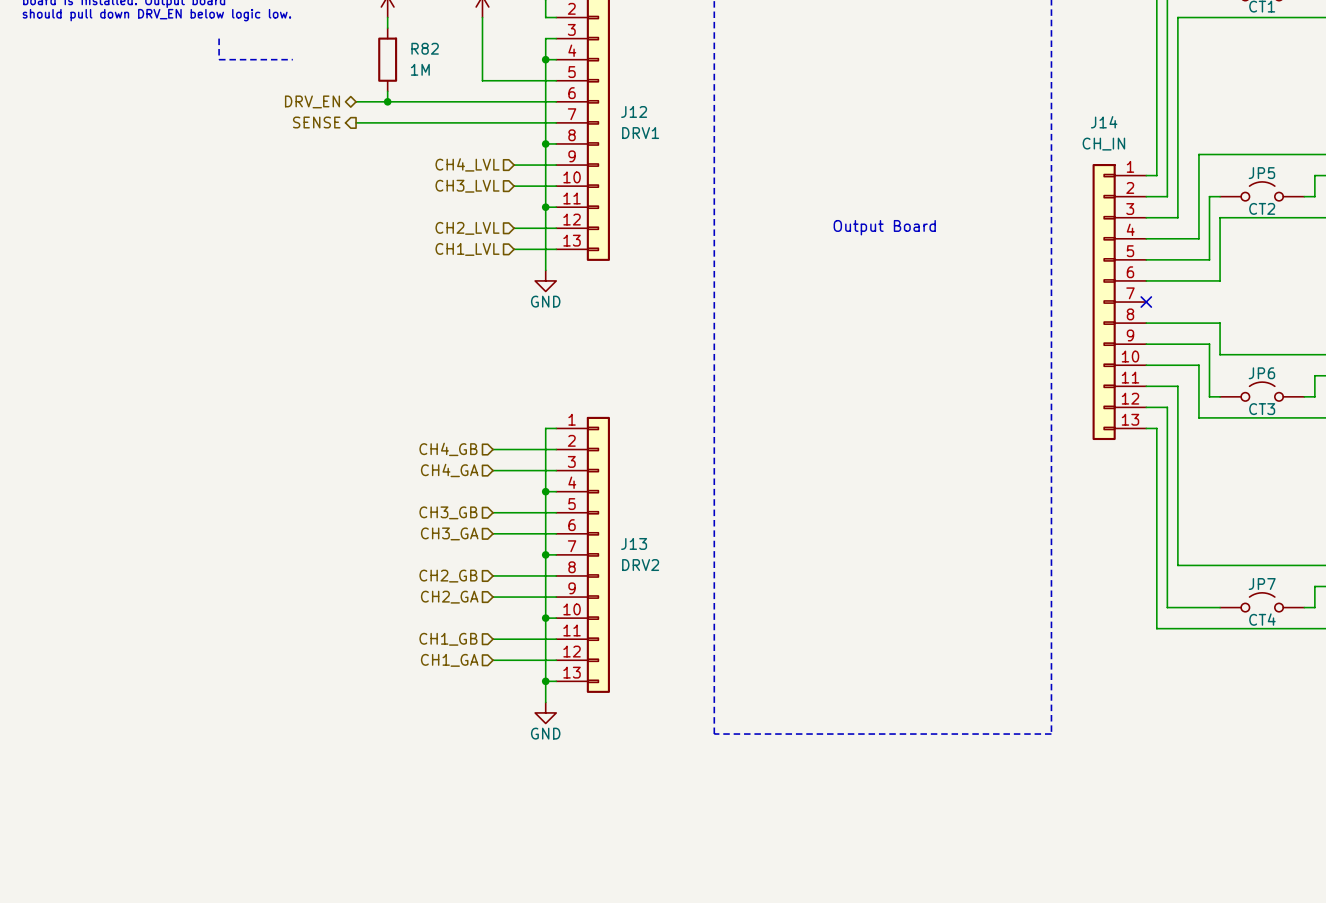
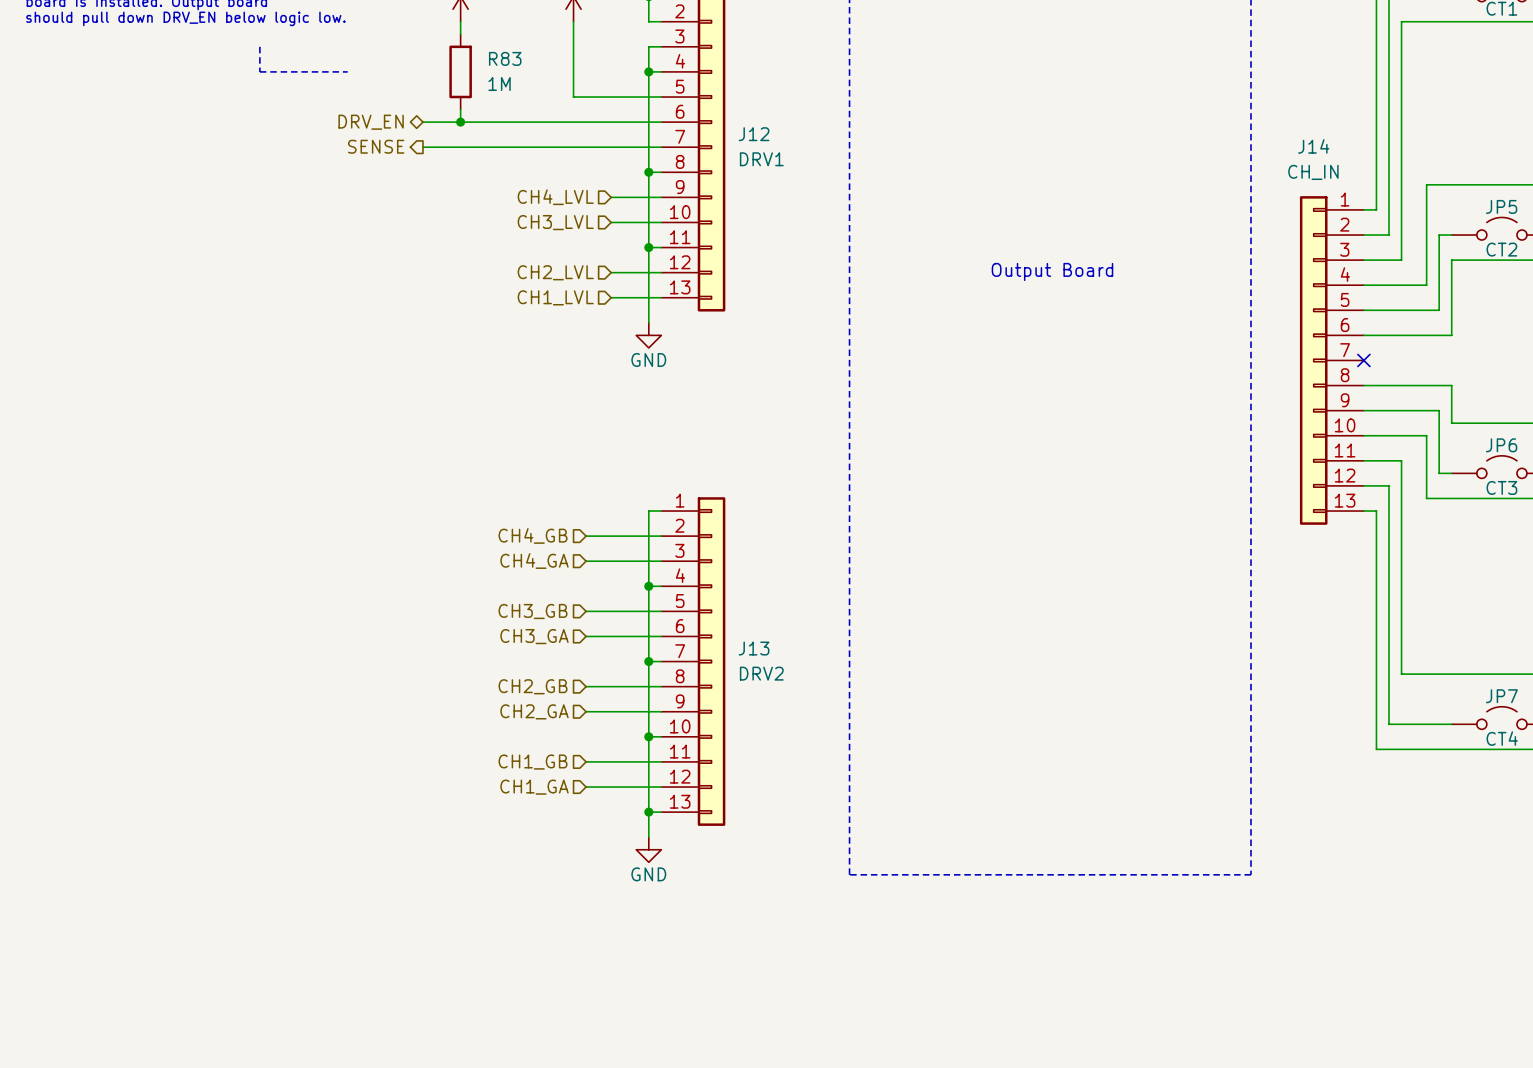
R82 name: R82 (425, 48) -> R83 (505, 58)

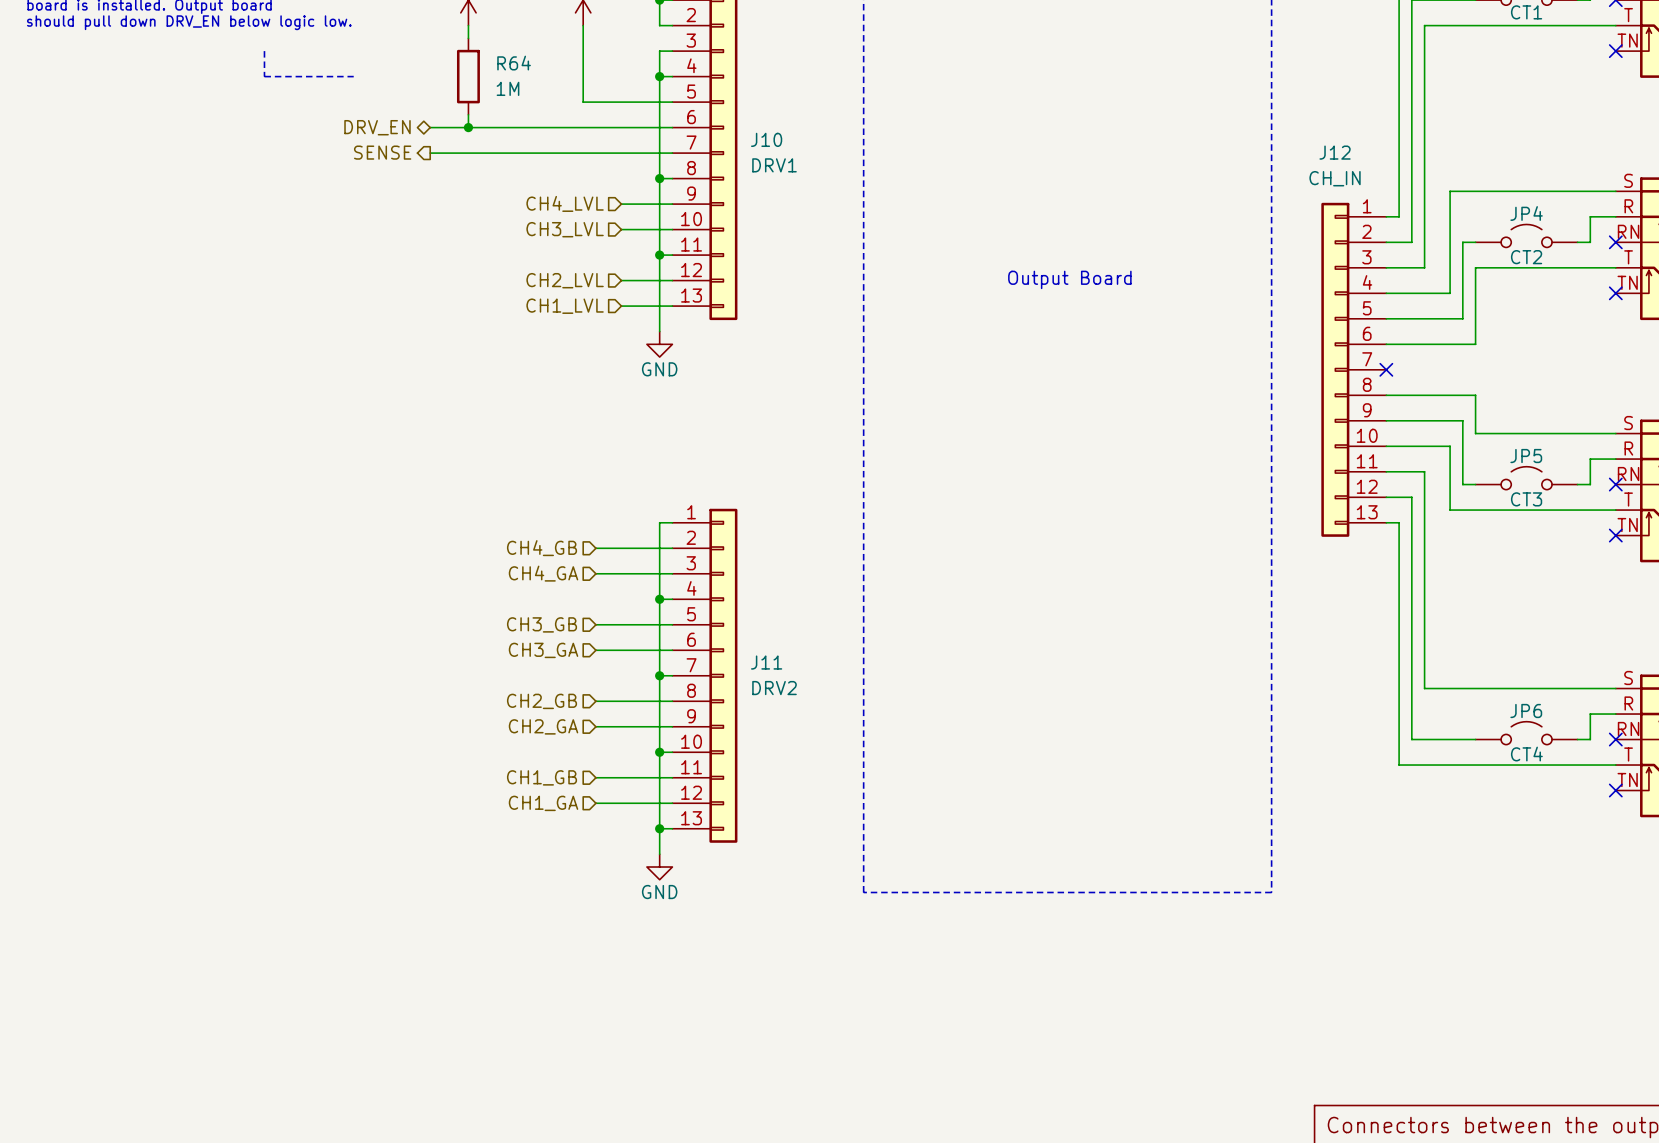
R83 name: R83 (505, 58) -> R64 (514, 63)
J12 name: J12 (754, 134) -> J10 (766, 139)
J14 name: J14 (1313, 146) -> J12 (1335, 152)
JP5 name: JP5 (1501, 206) -> JP4 (1526, 213)
JP6 name: JP6 (1501, 445) -> JP5 (1526, 456)
J13 name: J13 (754, 648) -> J11 (766, 662)
JP7 name: JP7 (1501, 696) -> JP6 (1526, 710)

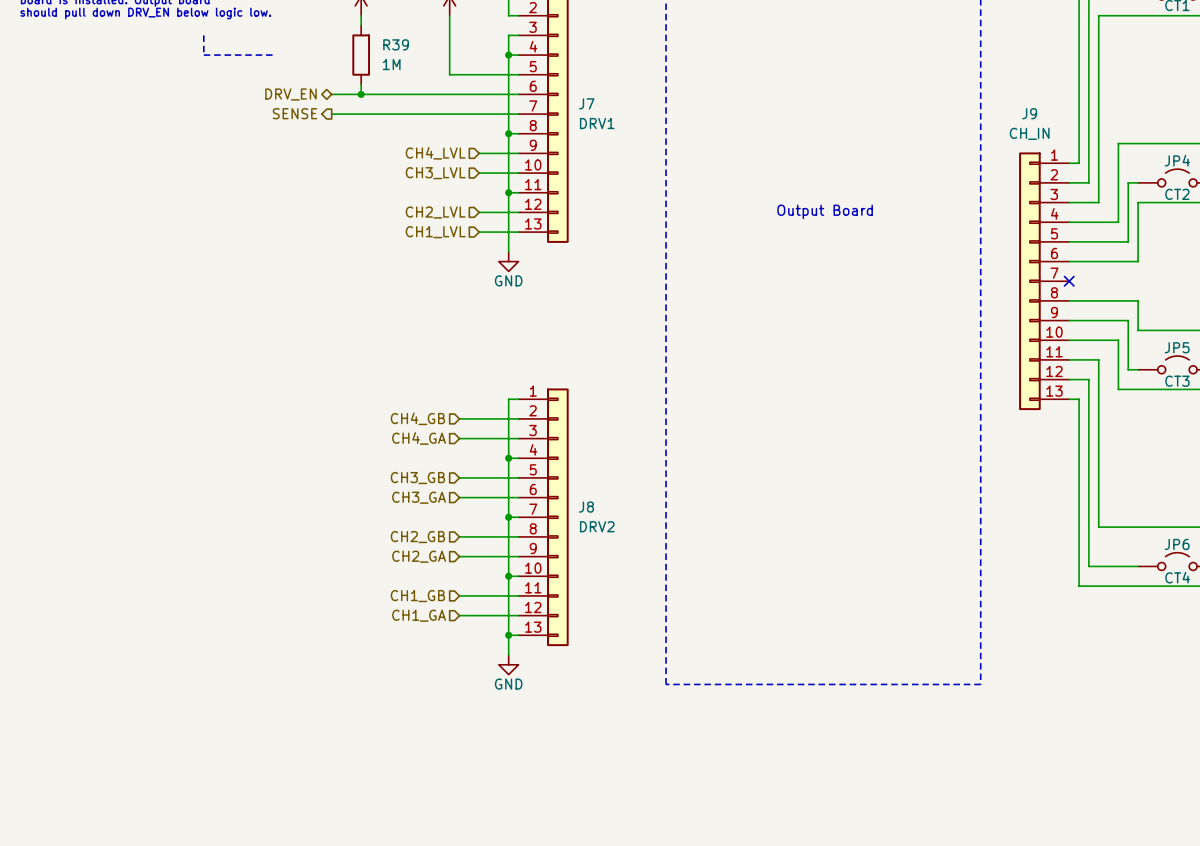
R64 name: R64 (514, 63) -> R39 (396, 44)
J10 name: J10 (766, 139) -> J7 (586, 103)
J12 name: J12 (1335, 152) -> J9 (1029, 113)
J11 name: J11 (766, 662) -> J8 (586, 507)

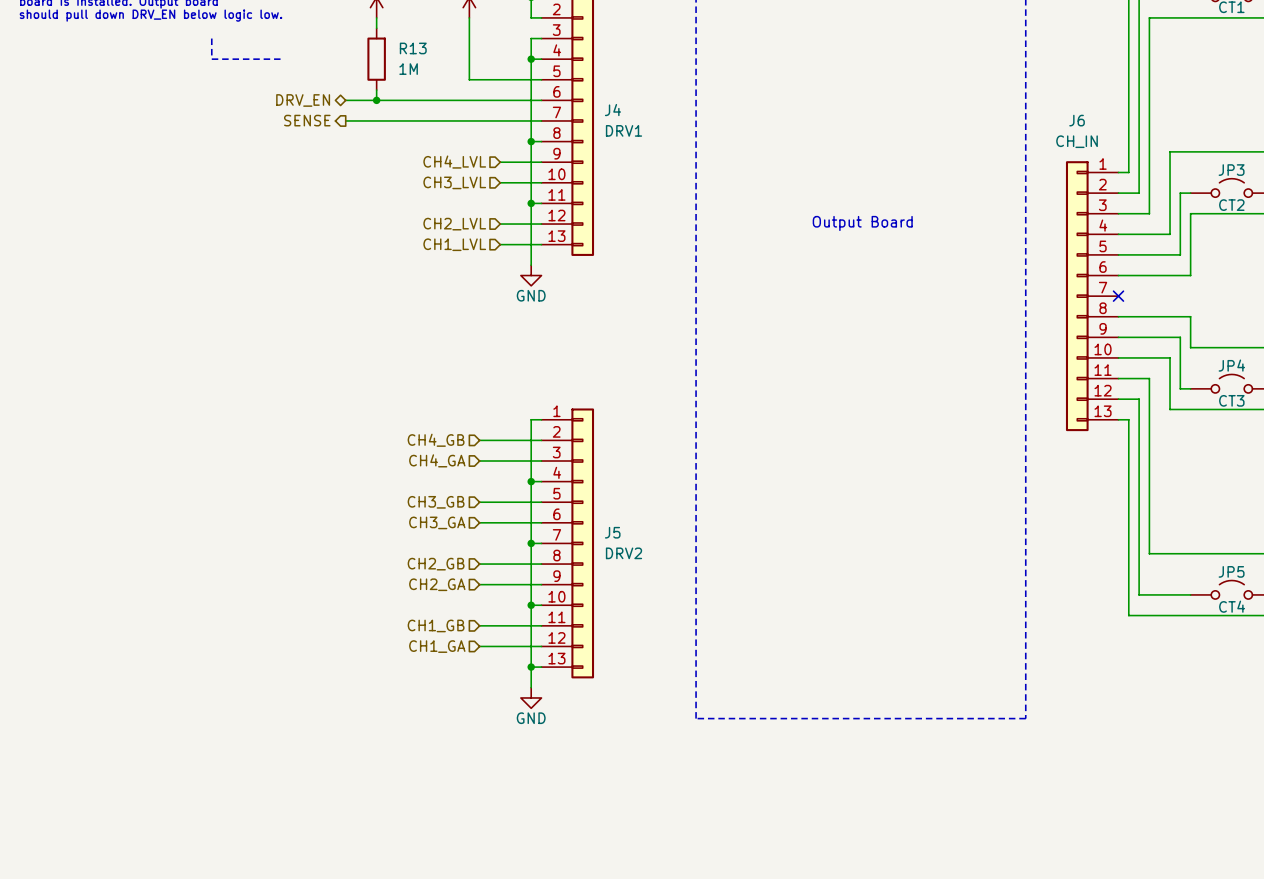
R39 name: R39 (396, 44) -> R13 (413, 48)
J7 name: J7 (586, 103) -> J4 (612, 110)
J9 name: J9 (1029, 113) -> J6 (1077, 120)
JP4 name: JP4 (1177, 160) -> JP3 (1231, 170)
JP5 name: JP5 (1177, 347) -> JP4 (1231, 365)
J8 name: J8 (586, 507) -> J5 (612, 532)
JP6 name: JP6 (1177, 544) -> JP5 (1231, 571)

